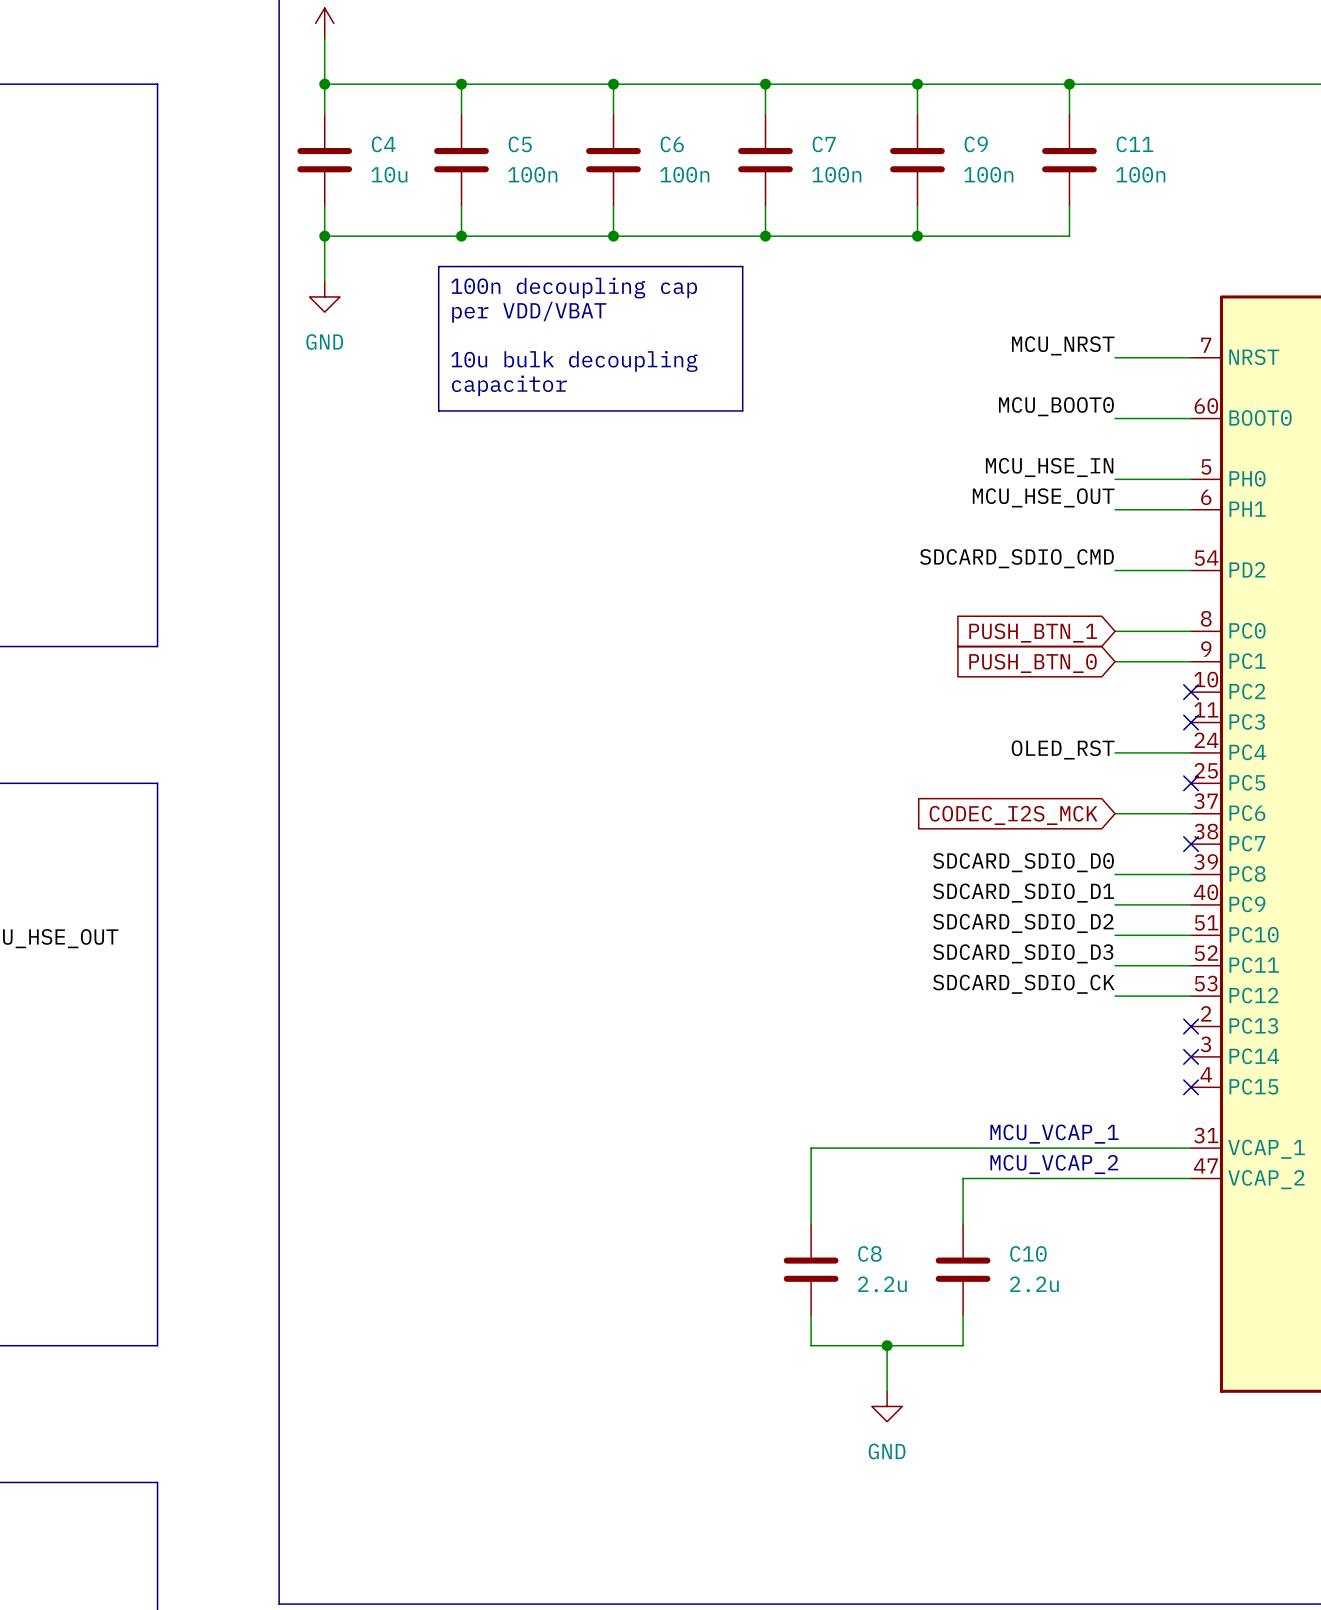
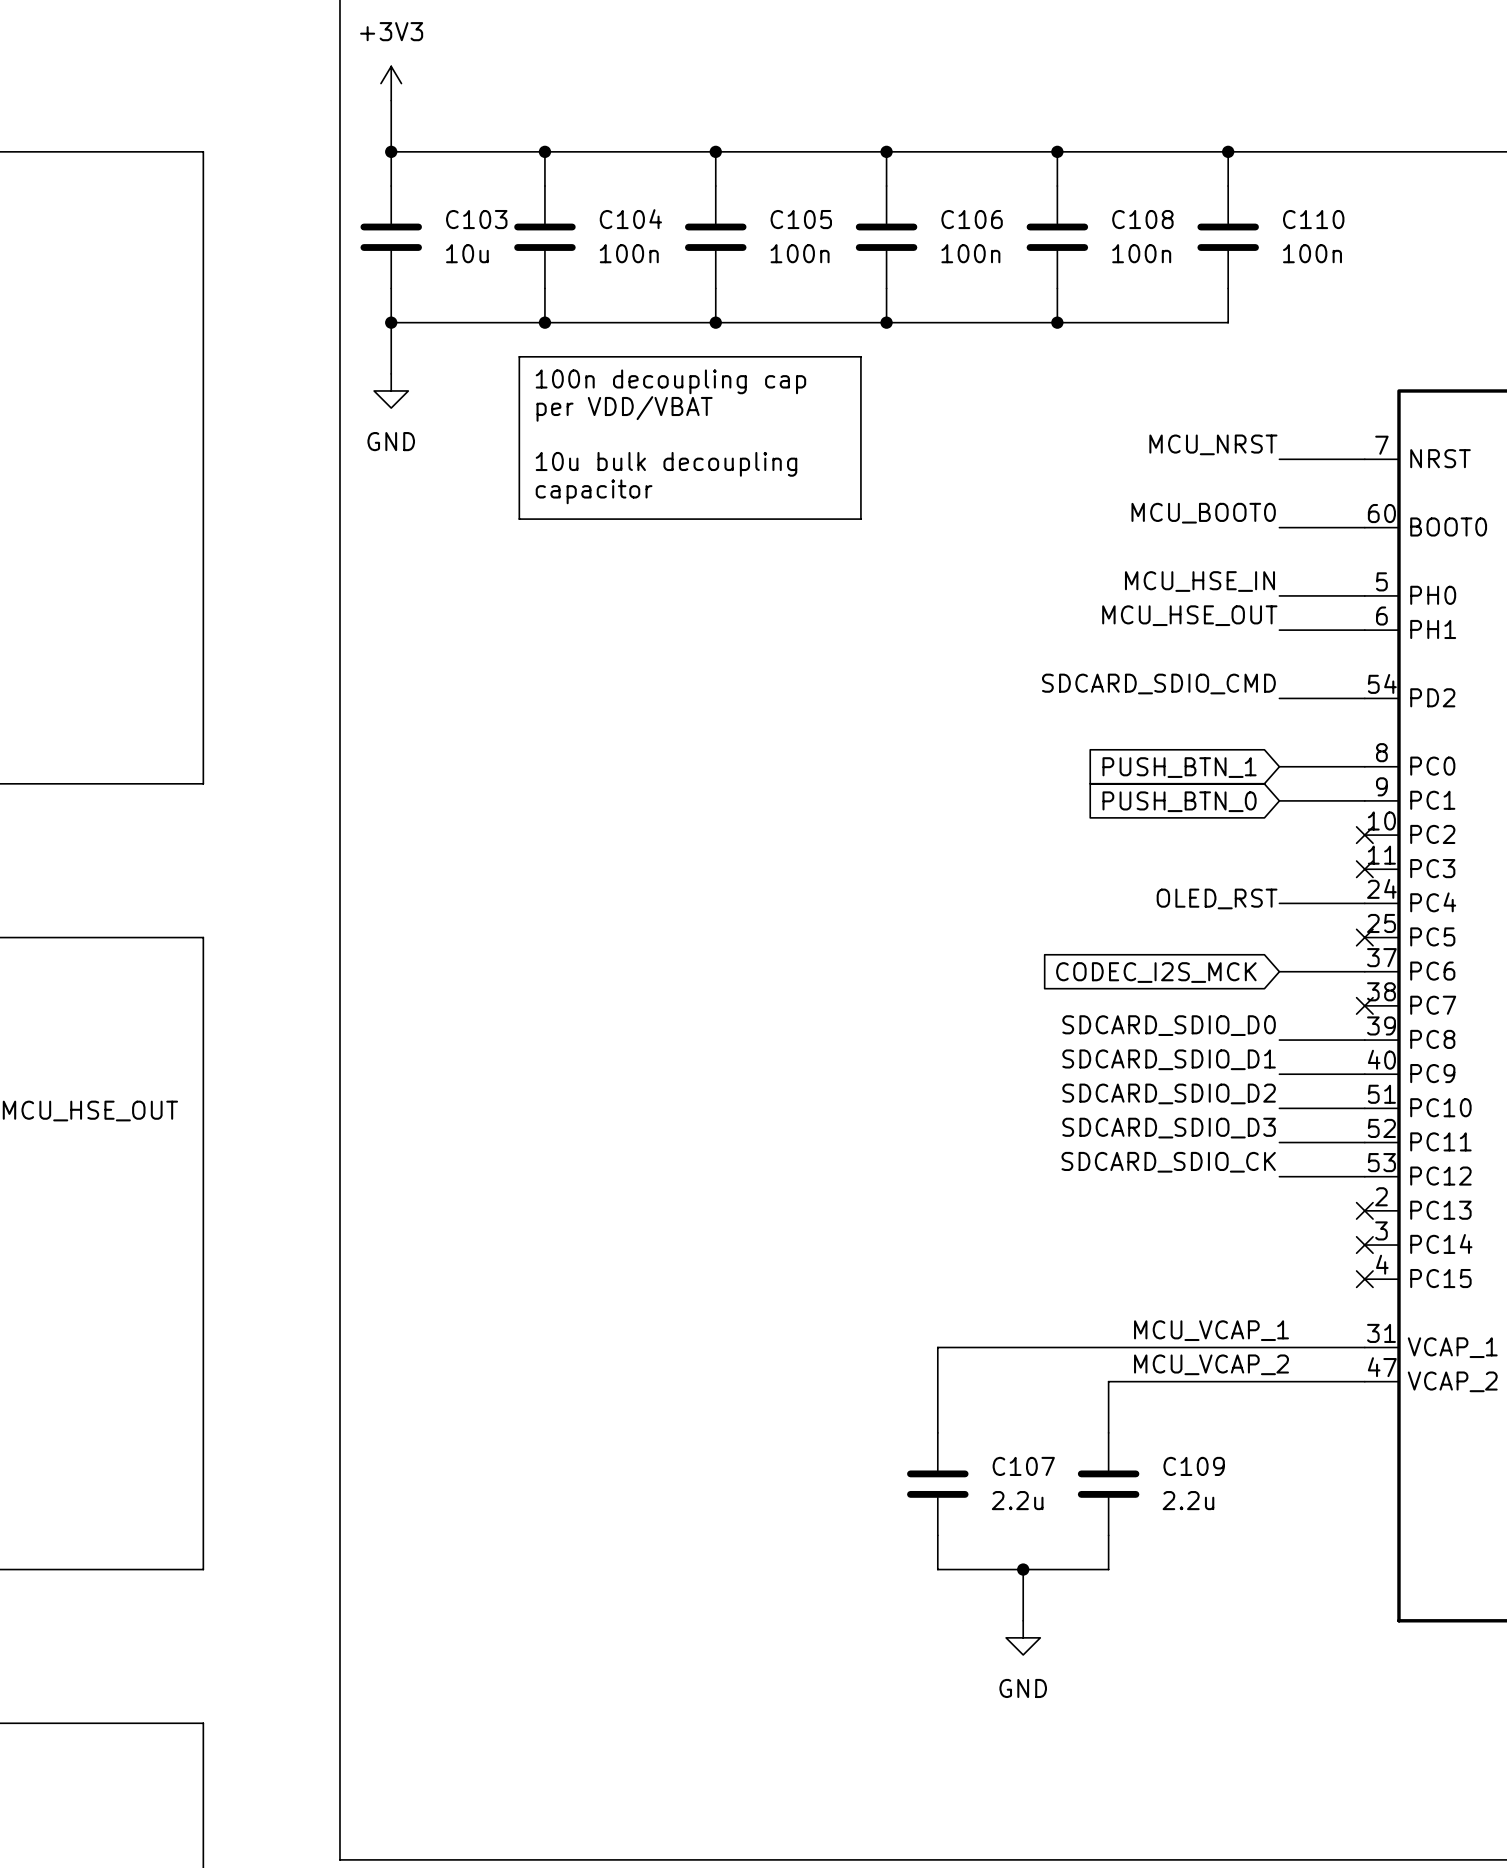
C4 name: C4 (383, 144) -> C103 (476, 219)
C5 name: C5 (520, 144) -> C104 (630, 219)
C6 name: C6 (672, 144) -> C105 (801, 219)
C7 name: C7 (824, 144) -> C106 (972, 219)
C9 name: C9 (976, 144) -> C108 (1142, 219)
C11 name: C11 (1134, 144) -> C110 (1313, 219)
C8 name: C8 (869, 1253) -> C107 (1023, 1466)
C10 name: C10 (1028, 1253) -> C109 (1194, 1466)

